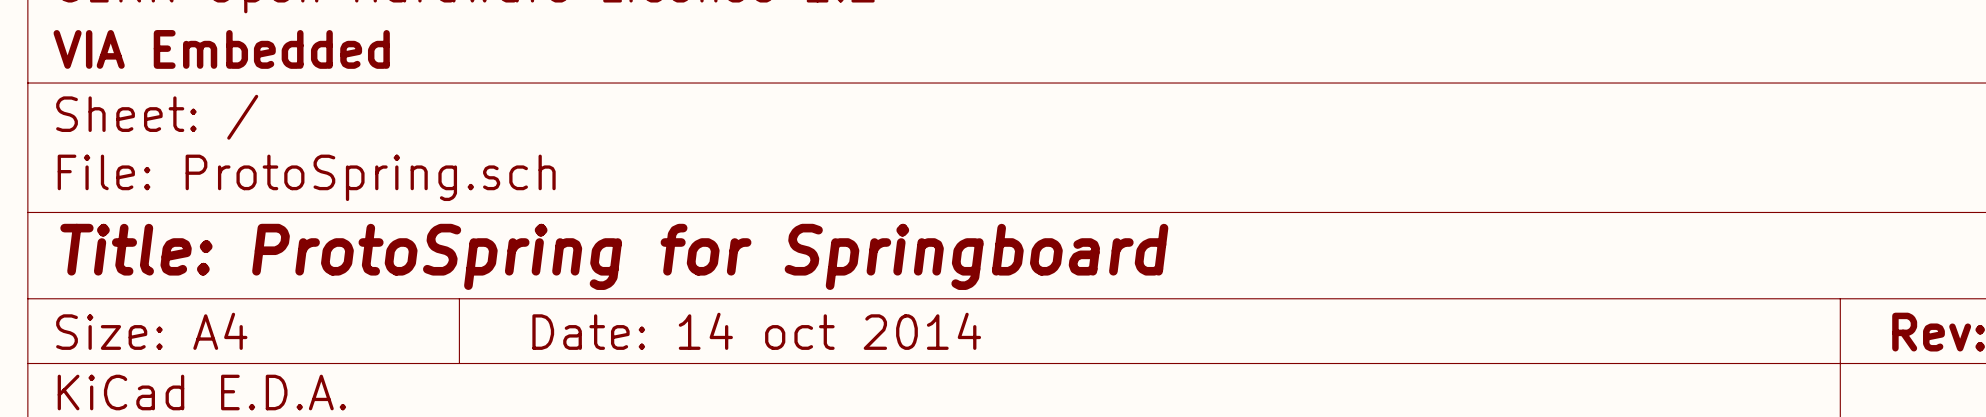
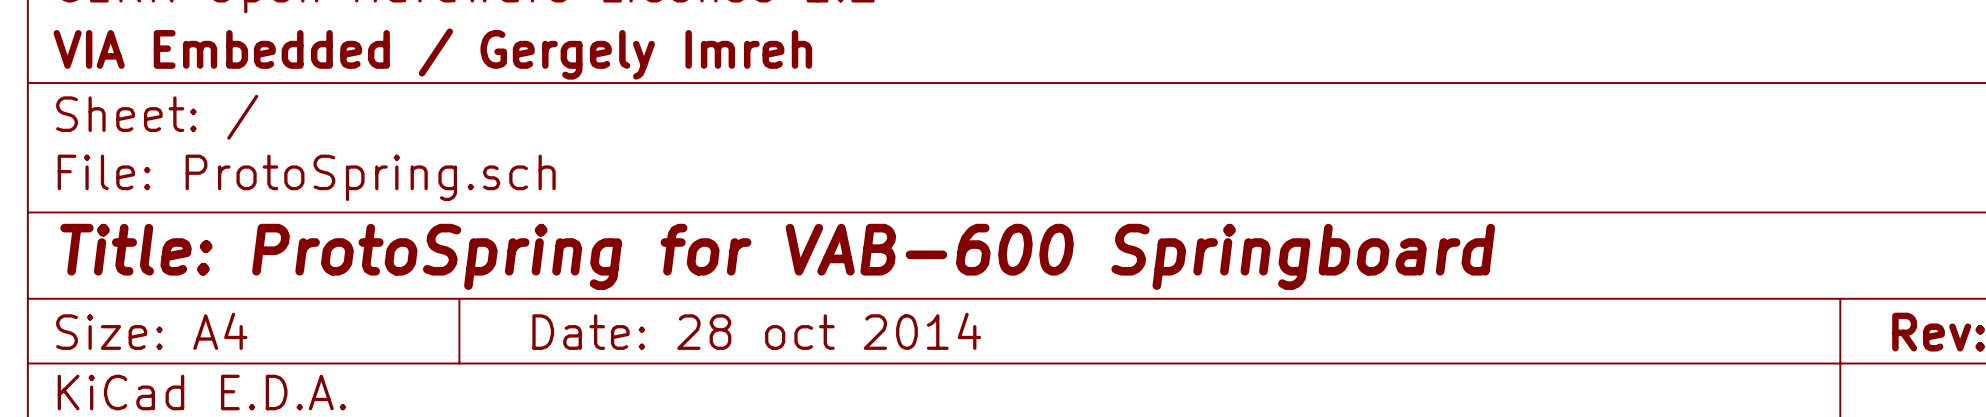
title block: VIA Embedded (221, 49) -> VIA Embedded / Gergely Imreh (432, 54)
title block: Title: ProtoSpring for Springboard (614, 256) -> Title: ProtoSpring for VAB-600 Springboard (777, 256)
title block: Date: 14 oct 2014 (756, 331) -> Date: 28 oct 2014 (756, 331)

